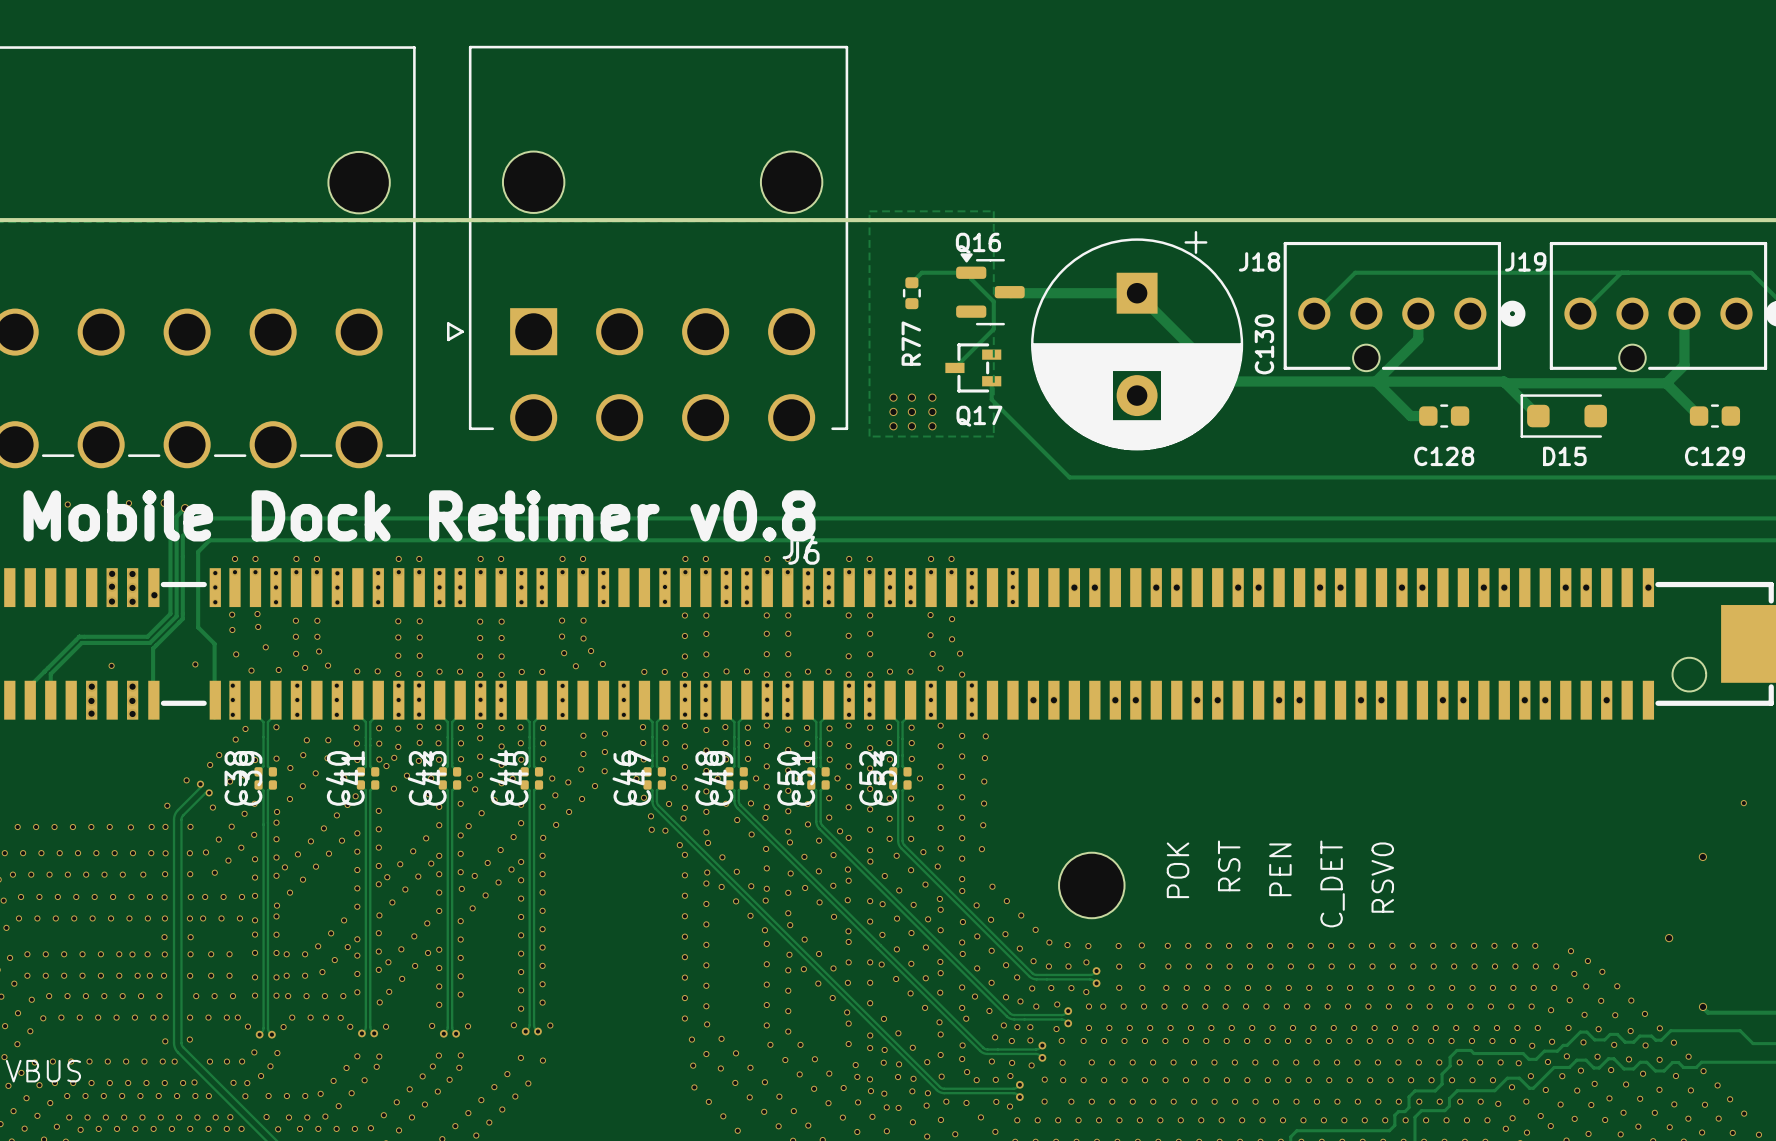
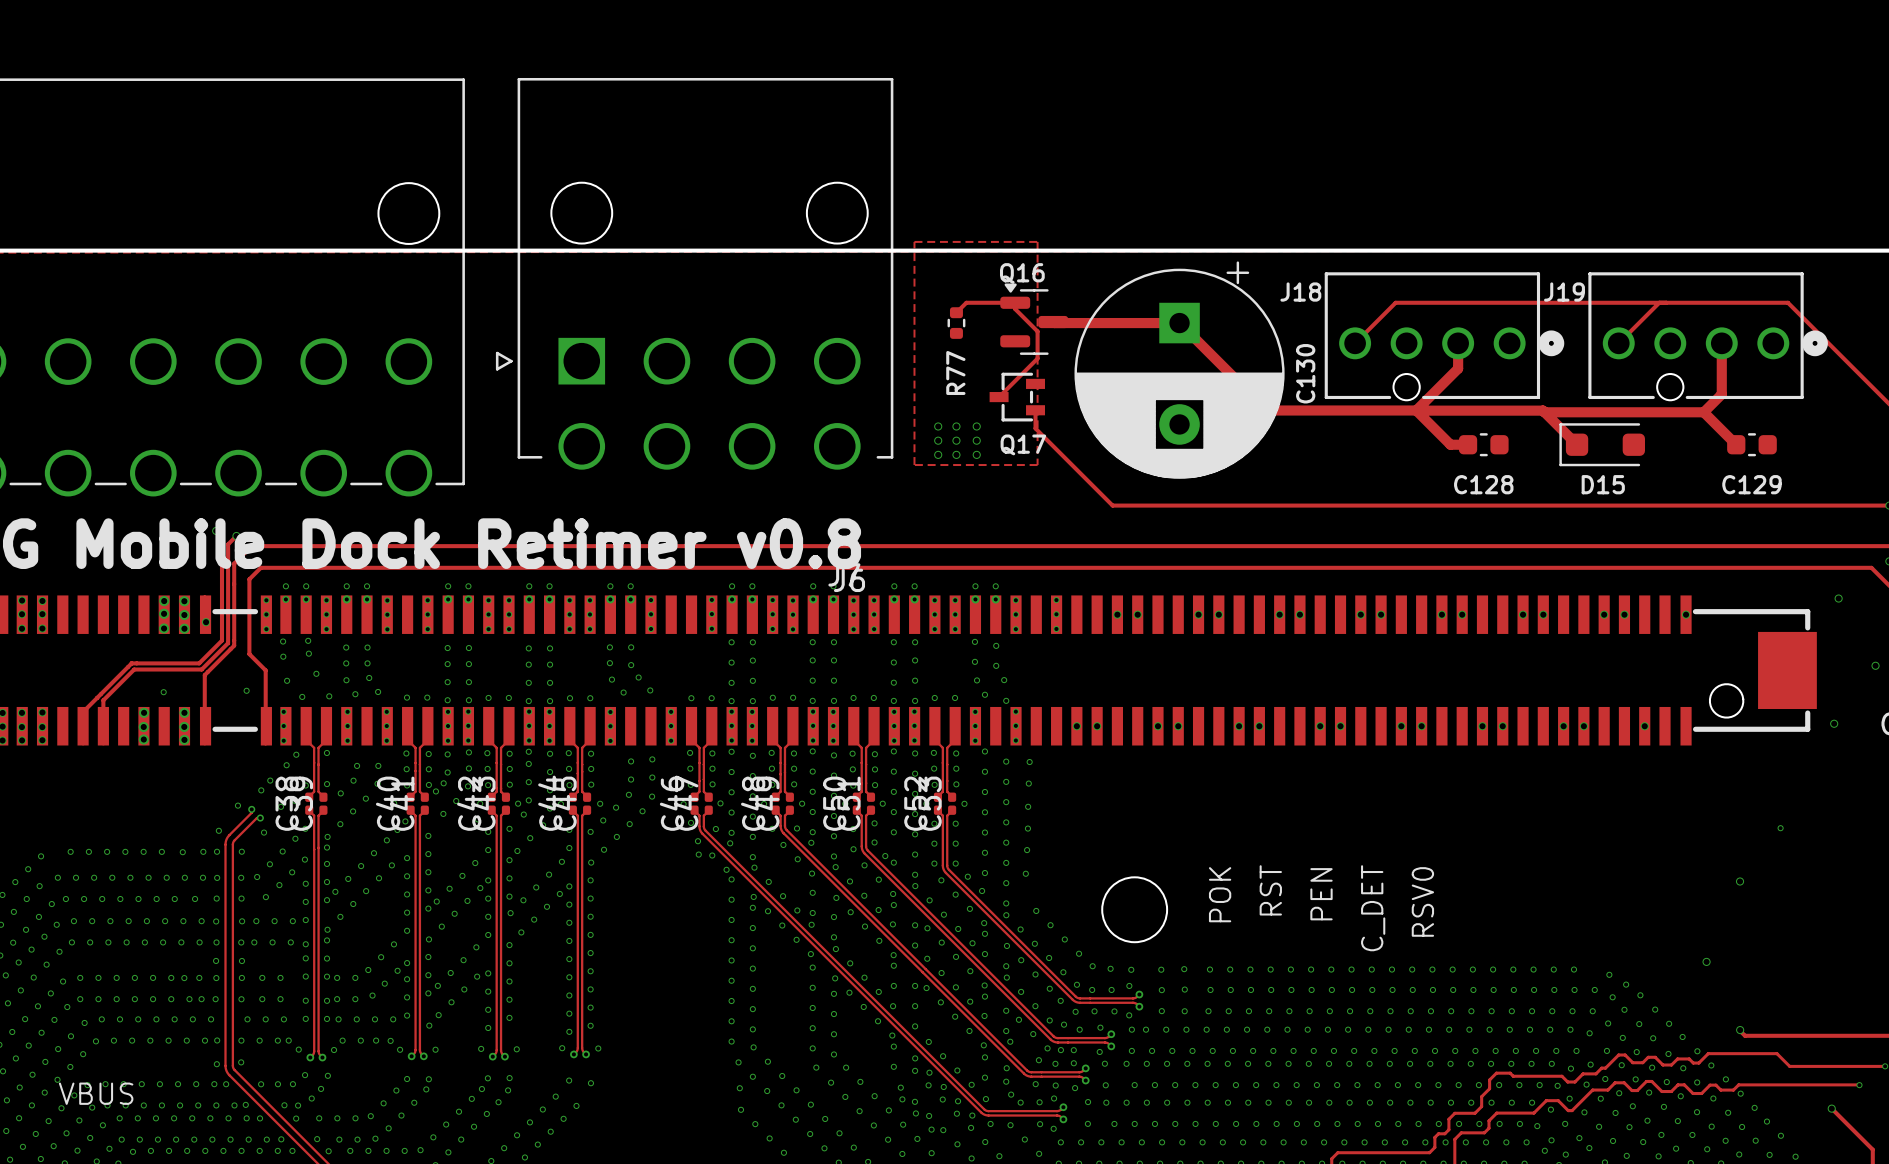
via: (128, 503) -> none
via: (67, 504) -> none

